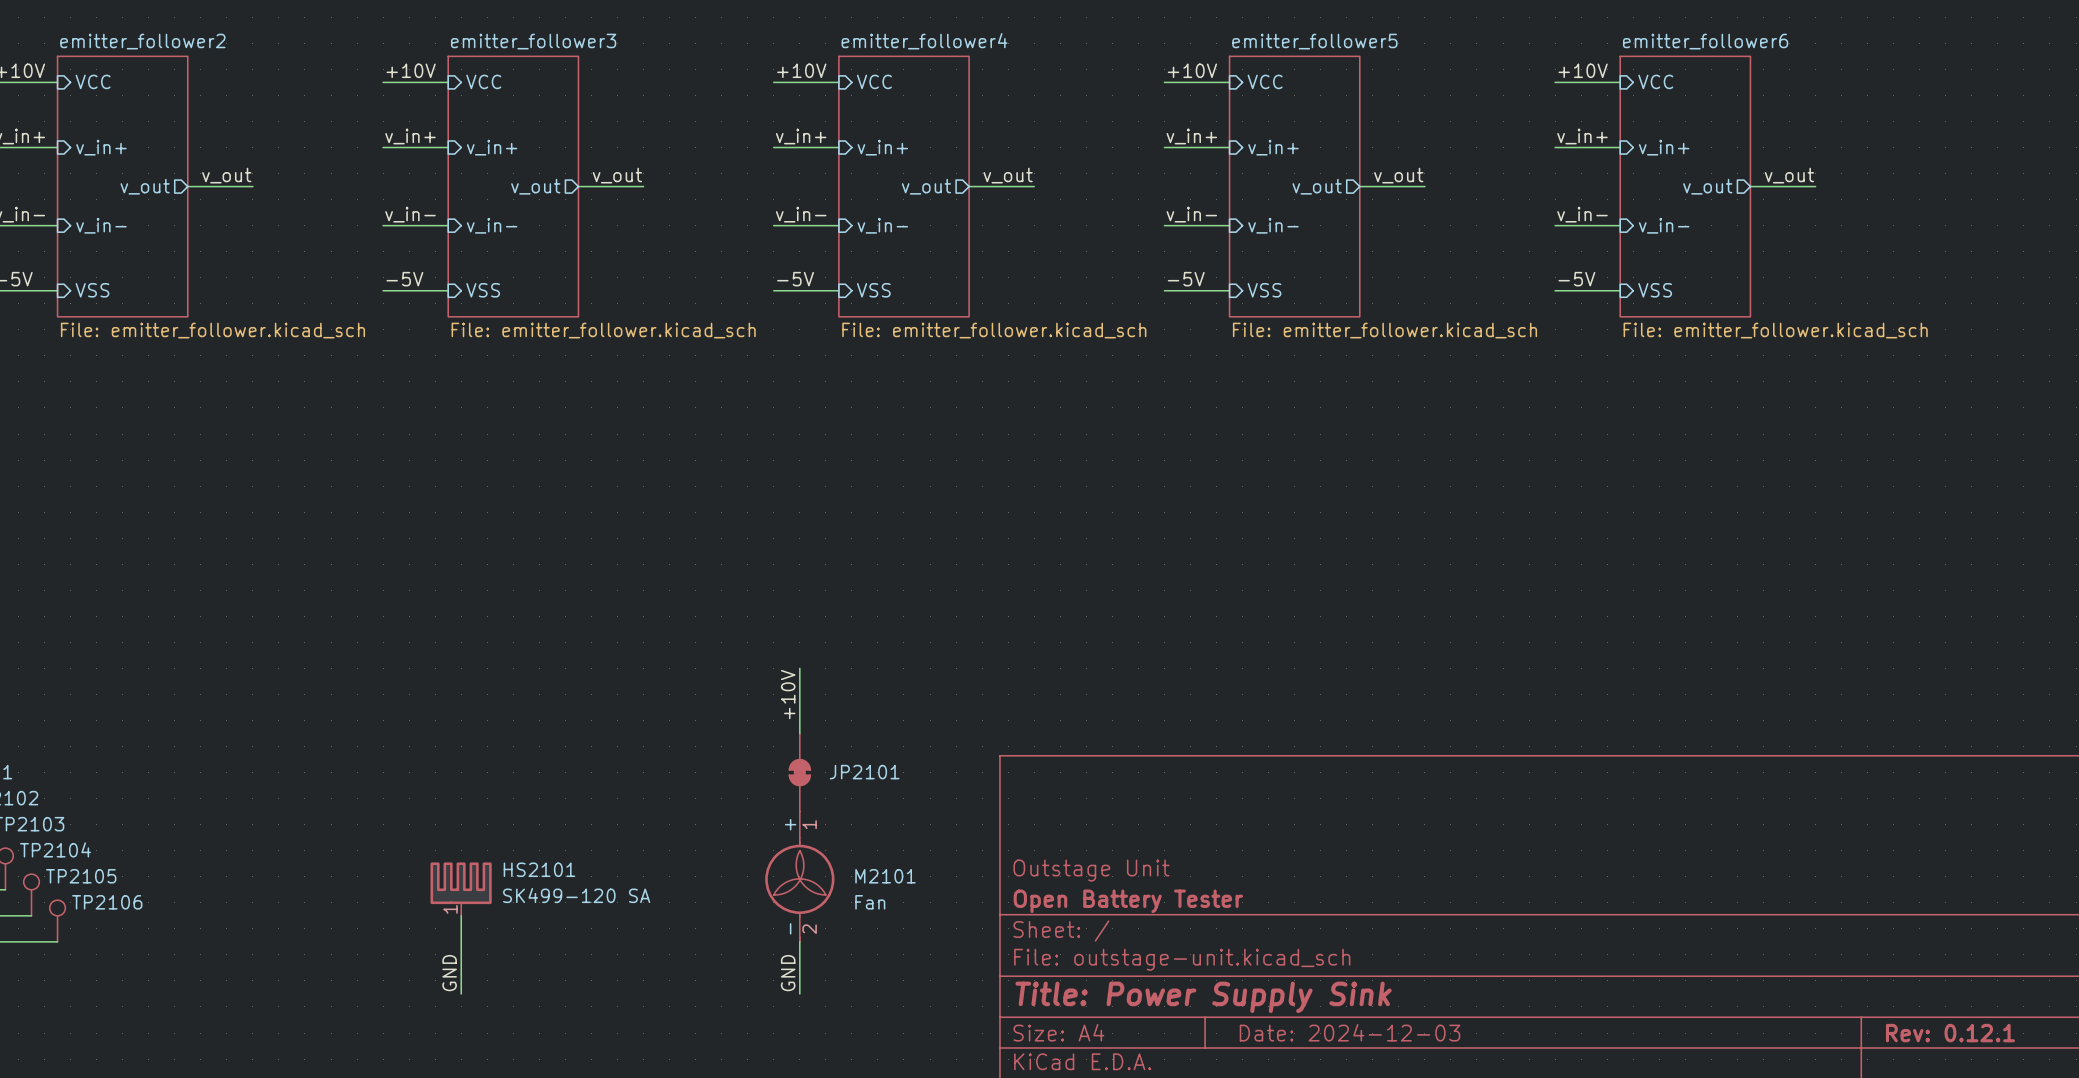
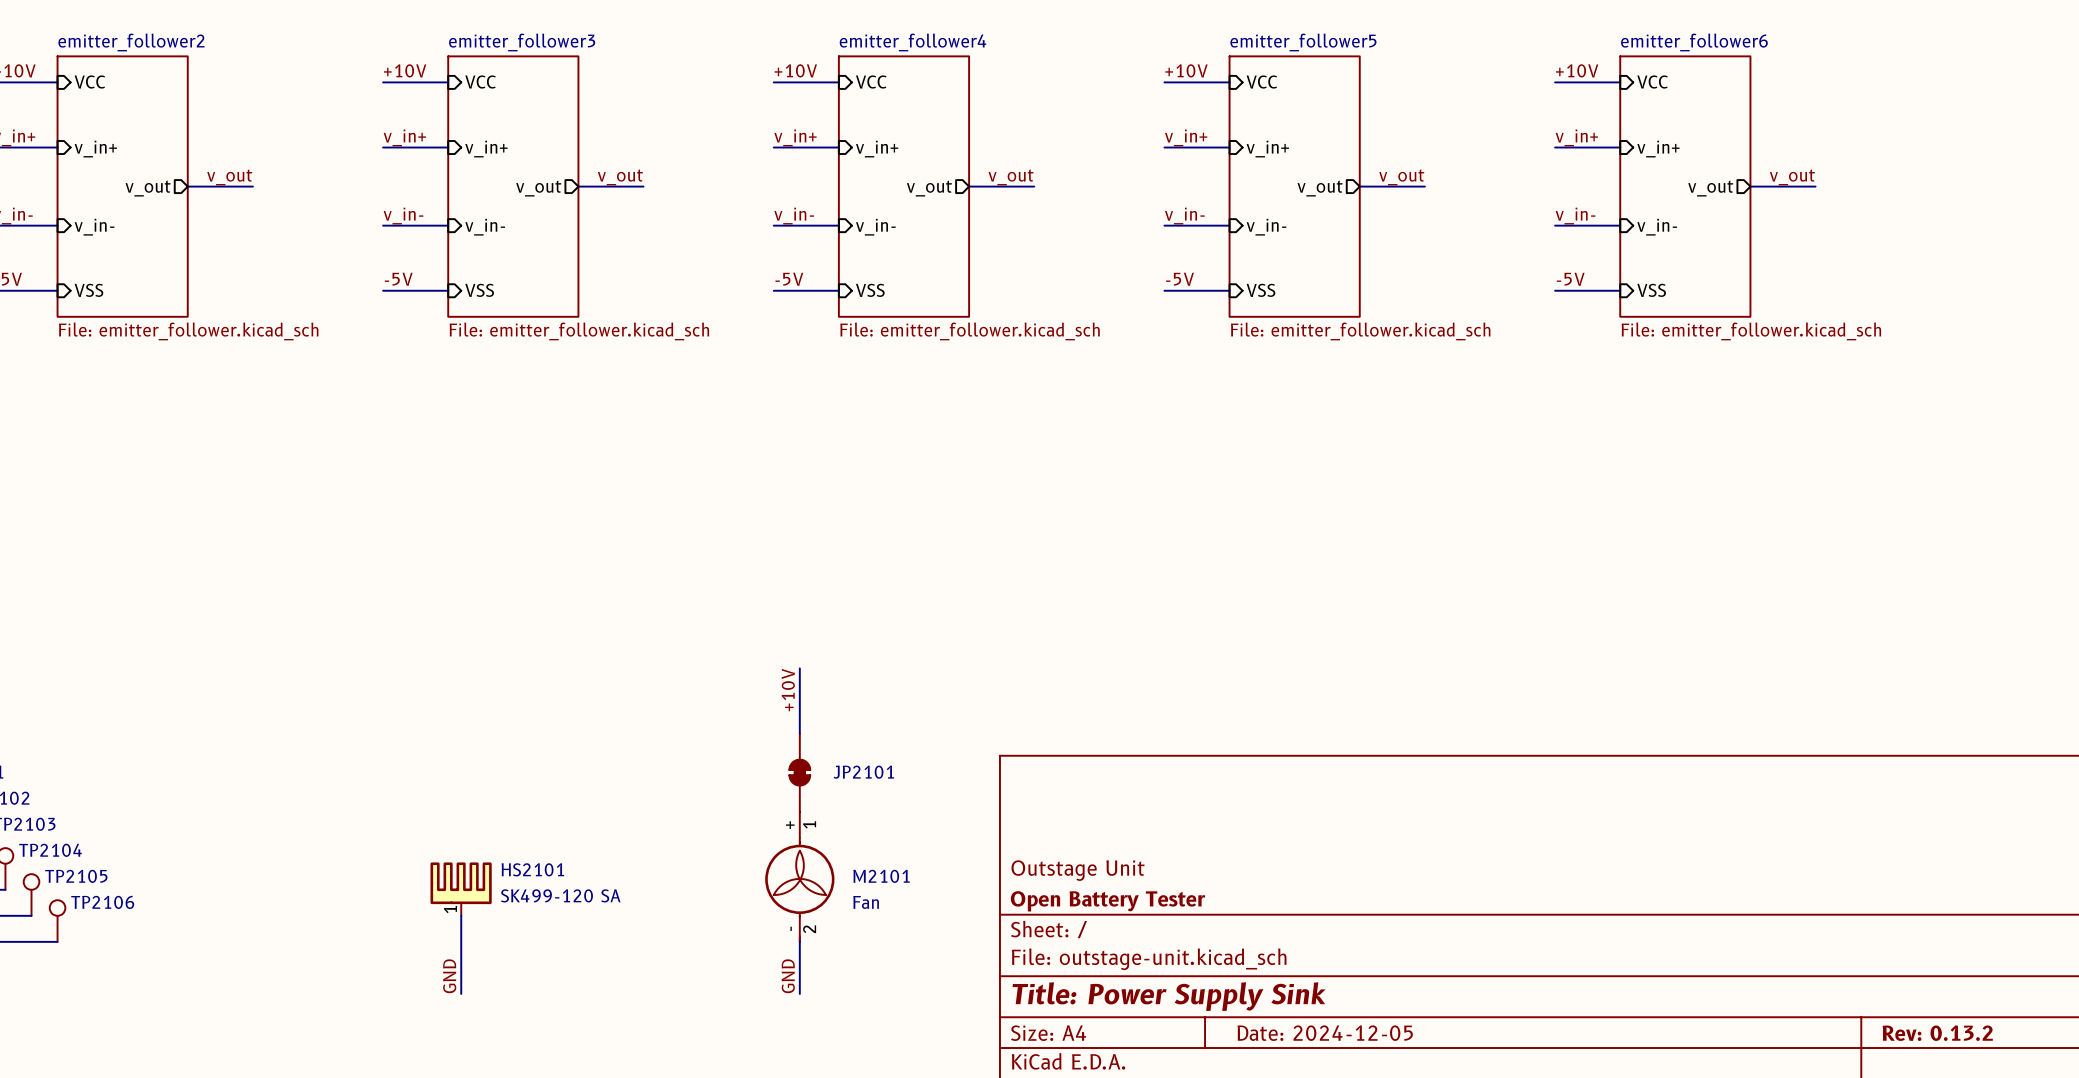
title block: Date: 2024-12-03 (1349, 1032) -> Date: 2024-12-05 (1325, 1033)
title block: Rev: 0.12.1 (1950, 1033) -> Rev: 0.13.2 (1937, 1033)

